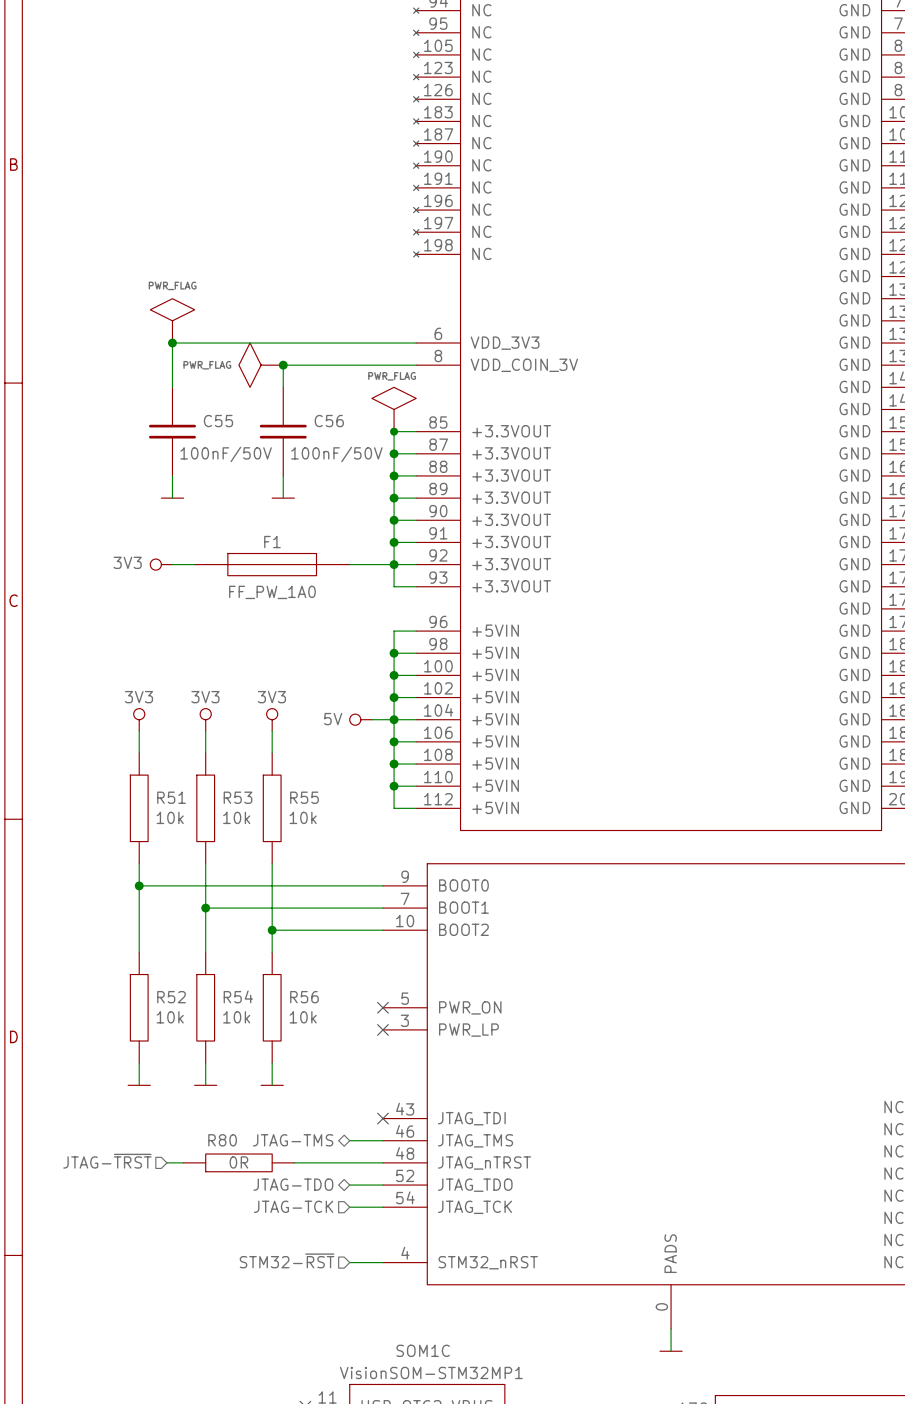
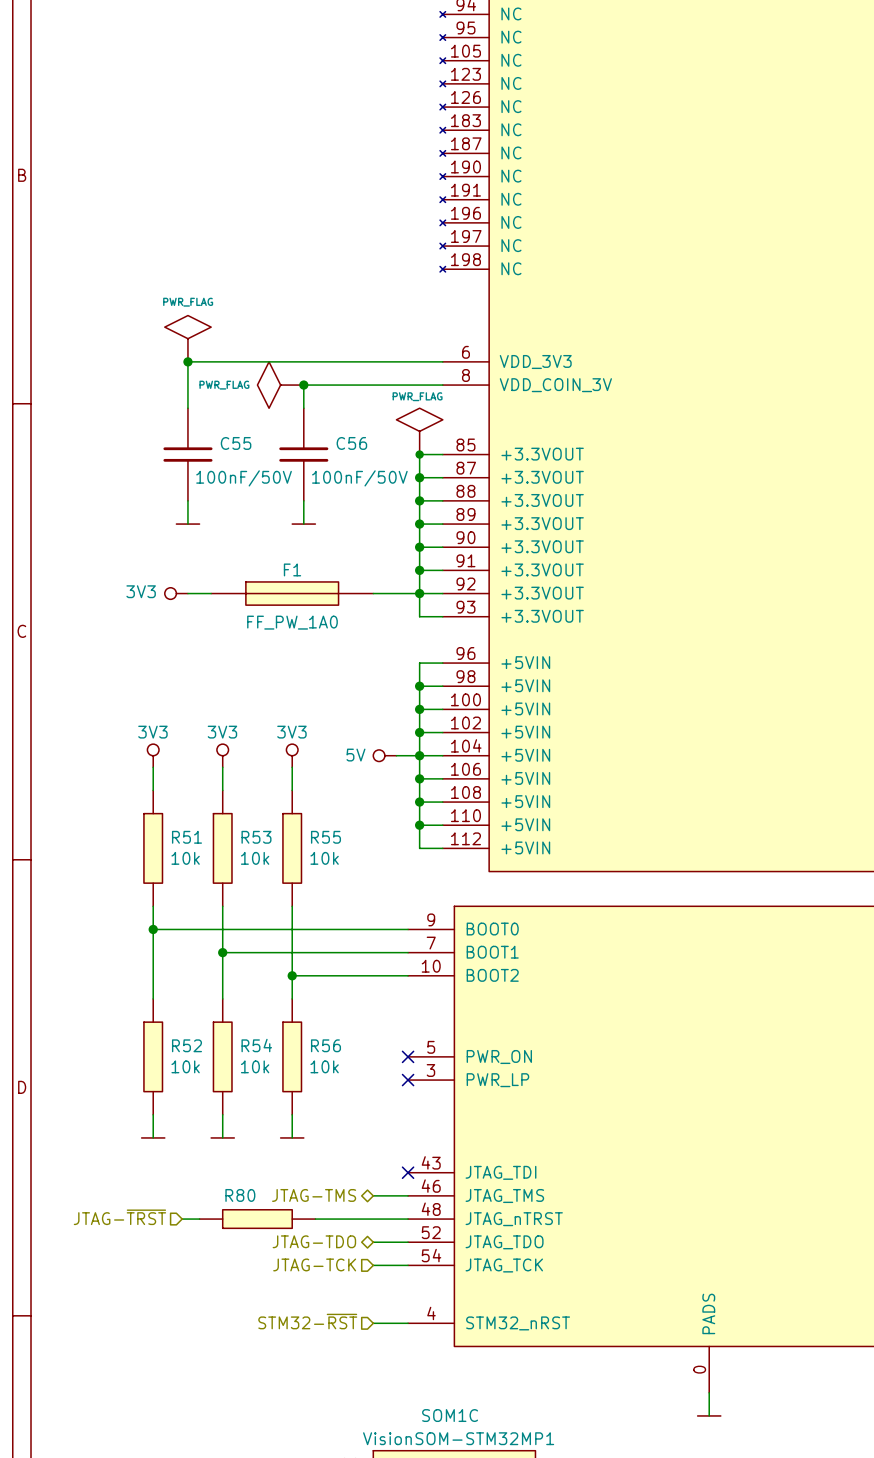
R80 value: 0R (238, 1162) -> none

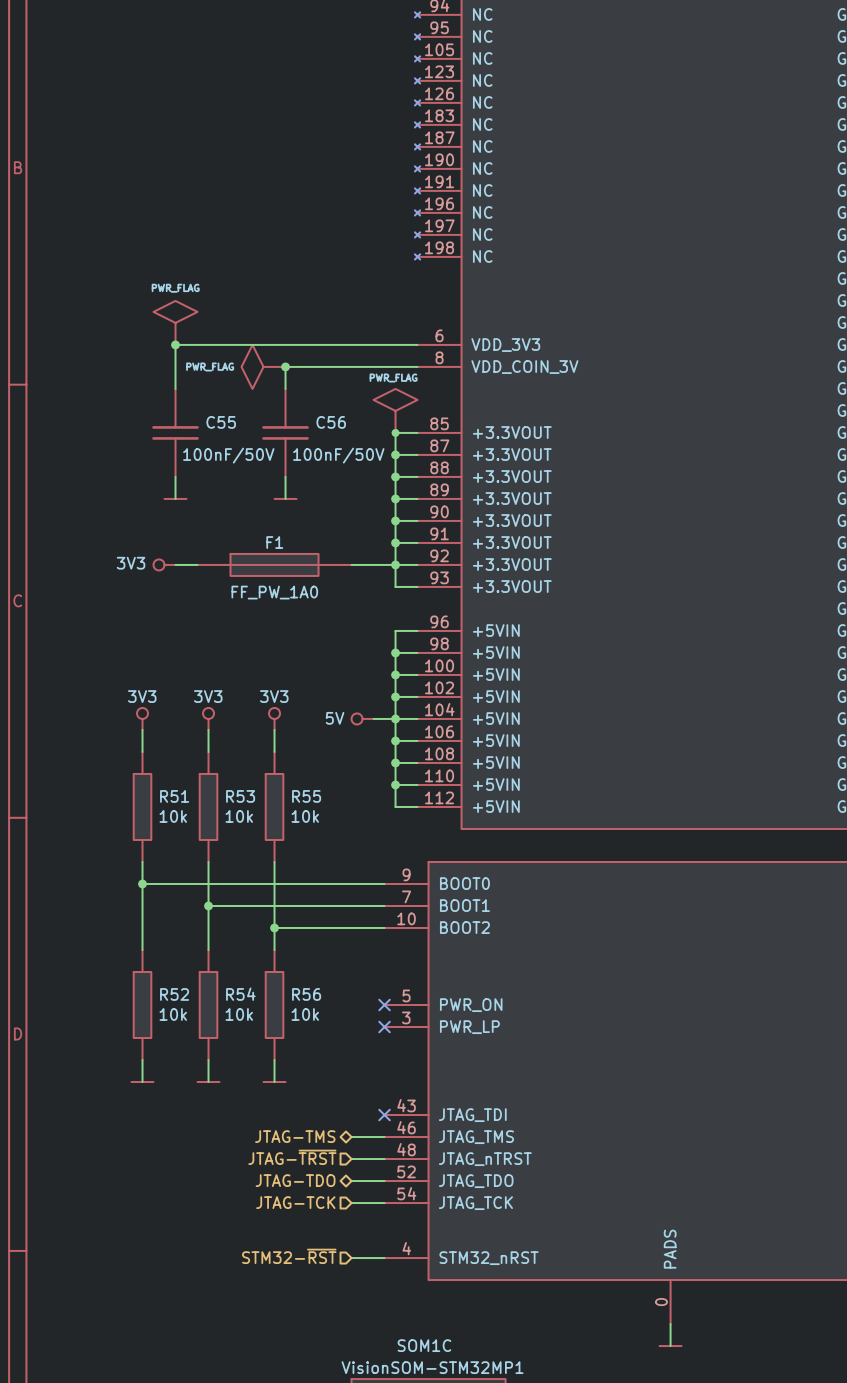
hierarchical label position: JTAG-~{TRST} (119, 1217) -> JTAG-~{TRST} (292, 1157)
wire: (182, 1219) (199, 1219) -> none
R80: (257, 1219) -> none
wire: (315, 1219) (373, 1219) -> none

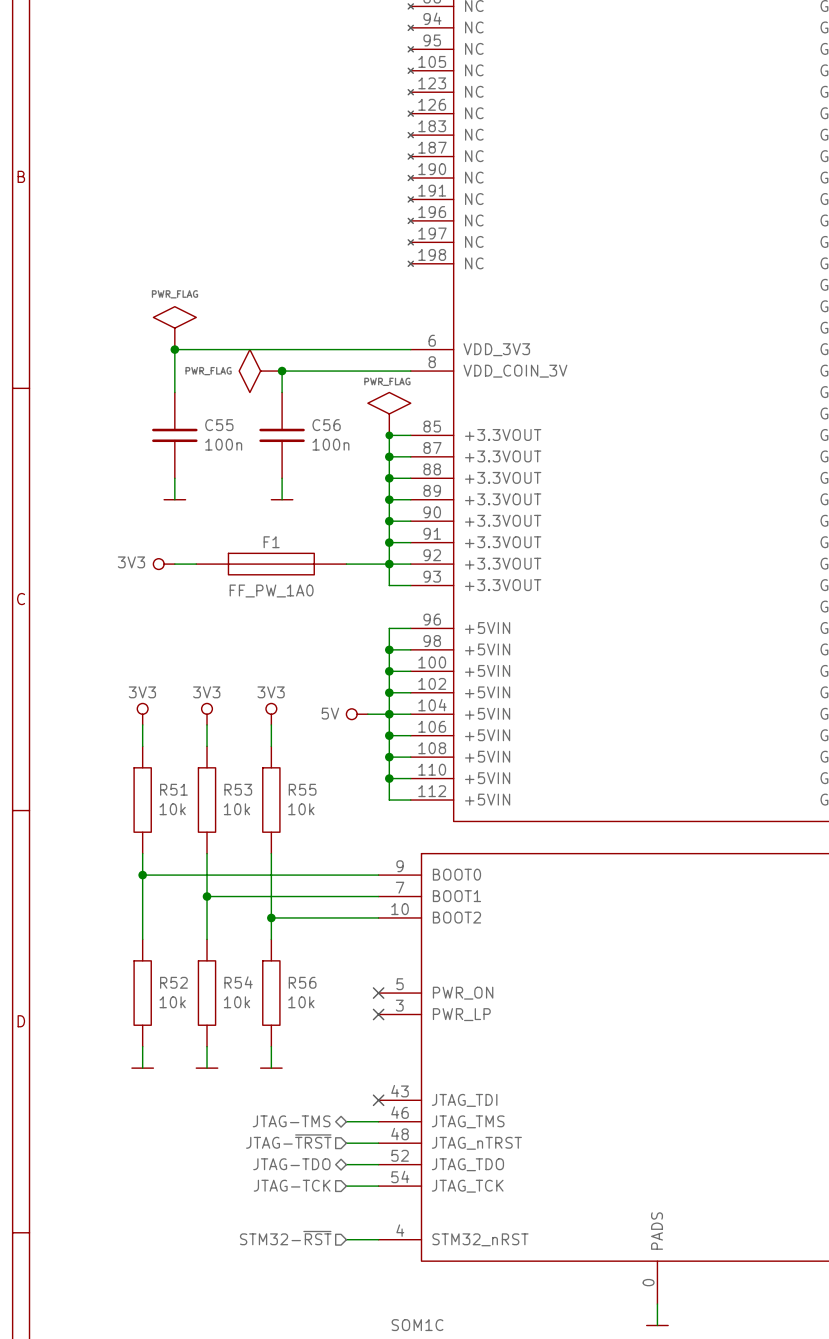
C55 value: 100nF/50V (228, 455) -> 100n (223, 444)
C56 value: 100nF/50V (338, 455) -> 100n (330, 444)

